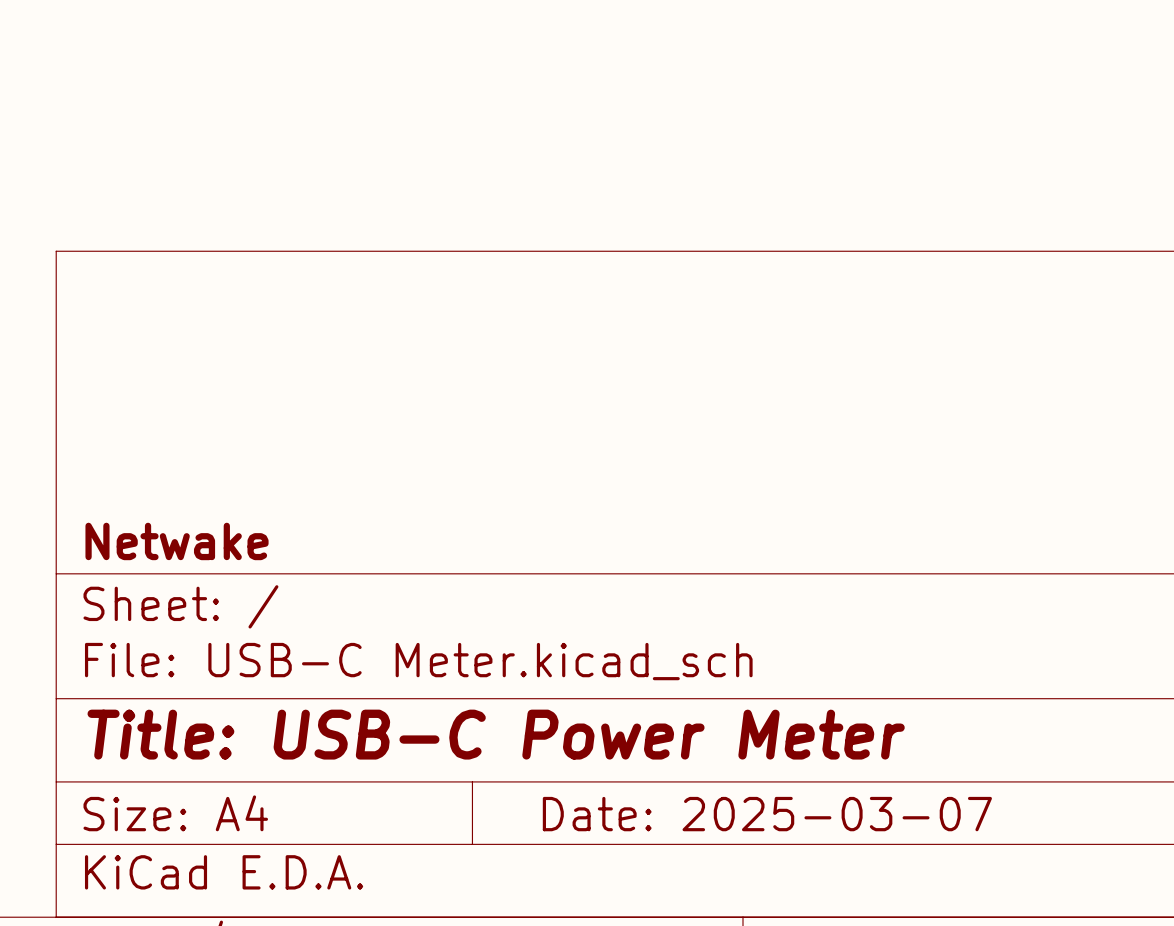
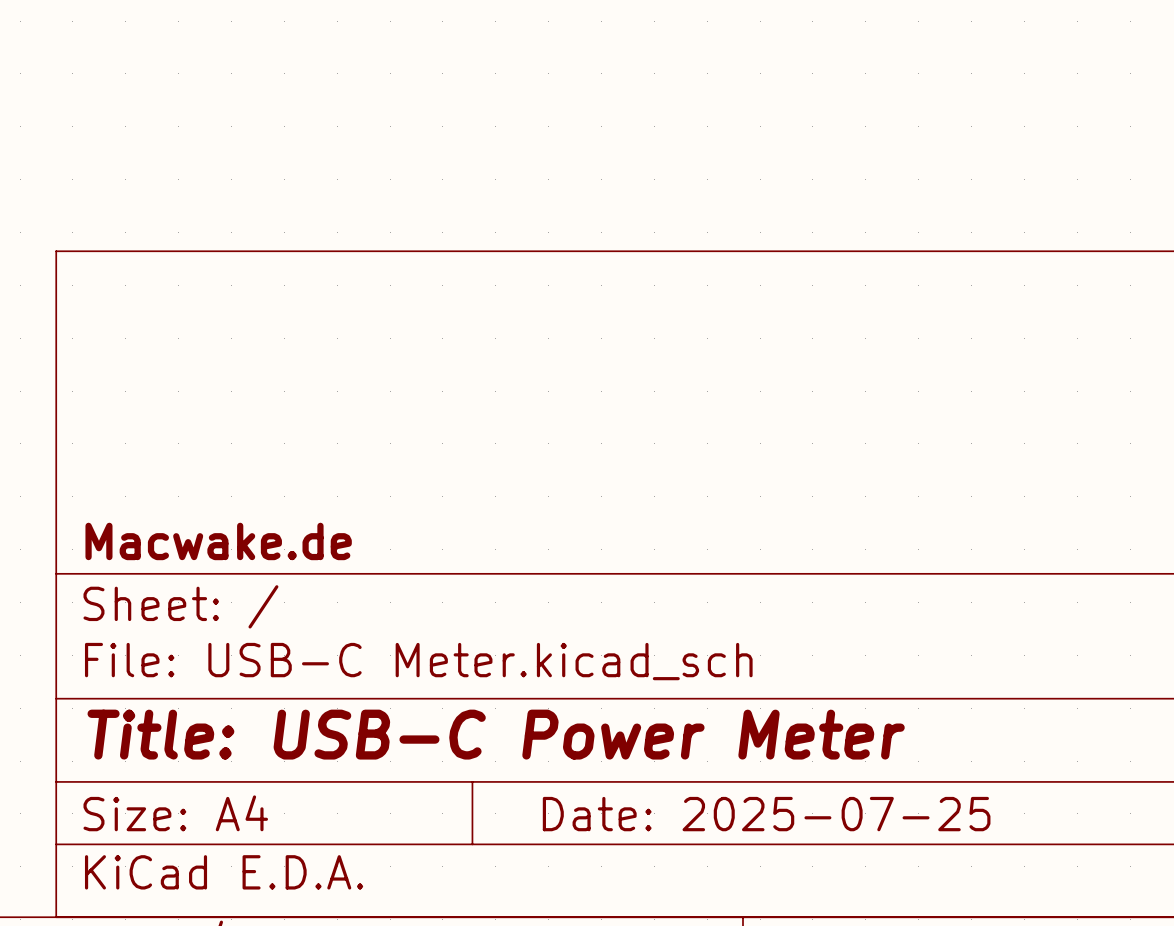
title block: Netwake (177, 541) -> Macwake.de (218, 541)
title block: Date: 2025-03-07 (767, 814) -> Date: 2025-07-25 (766, 814)

